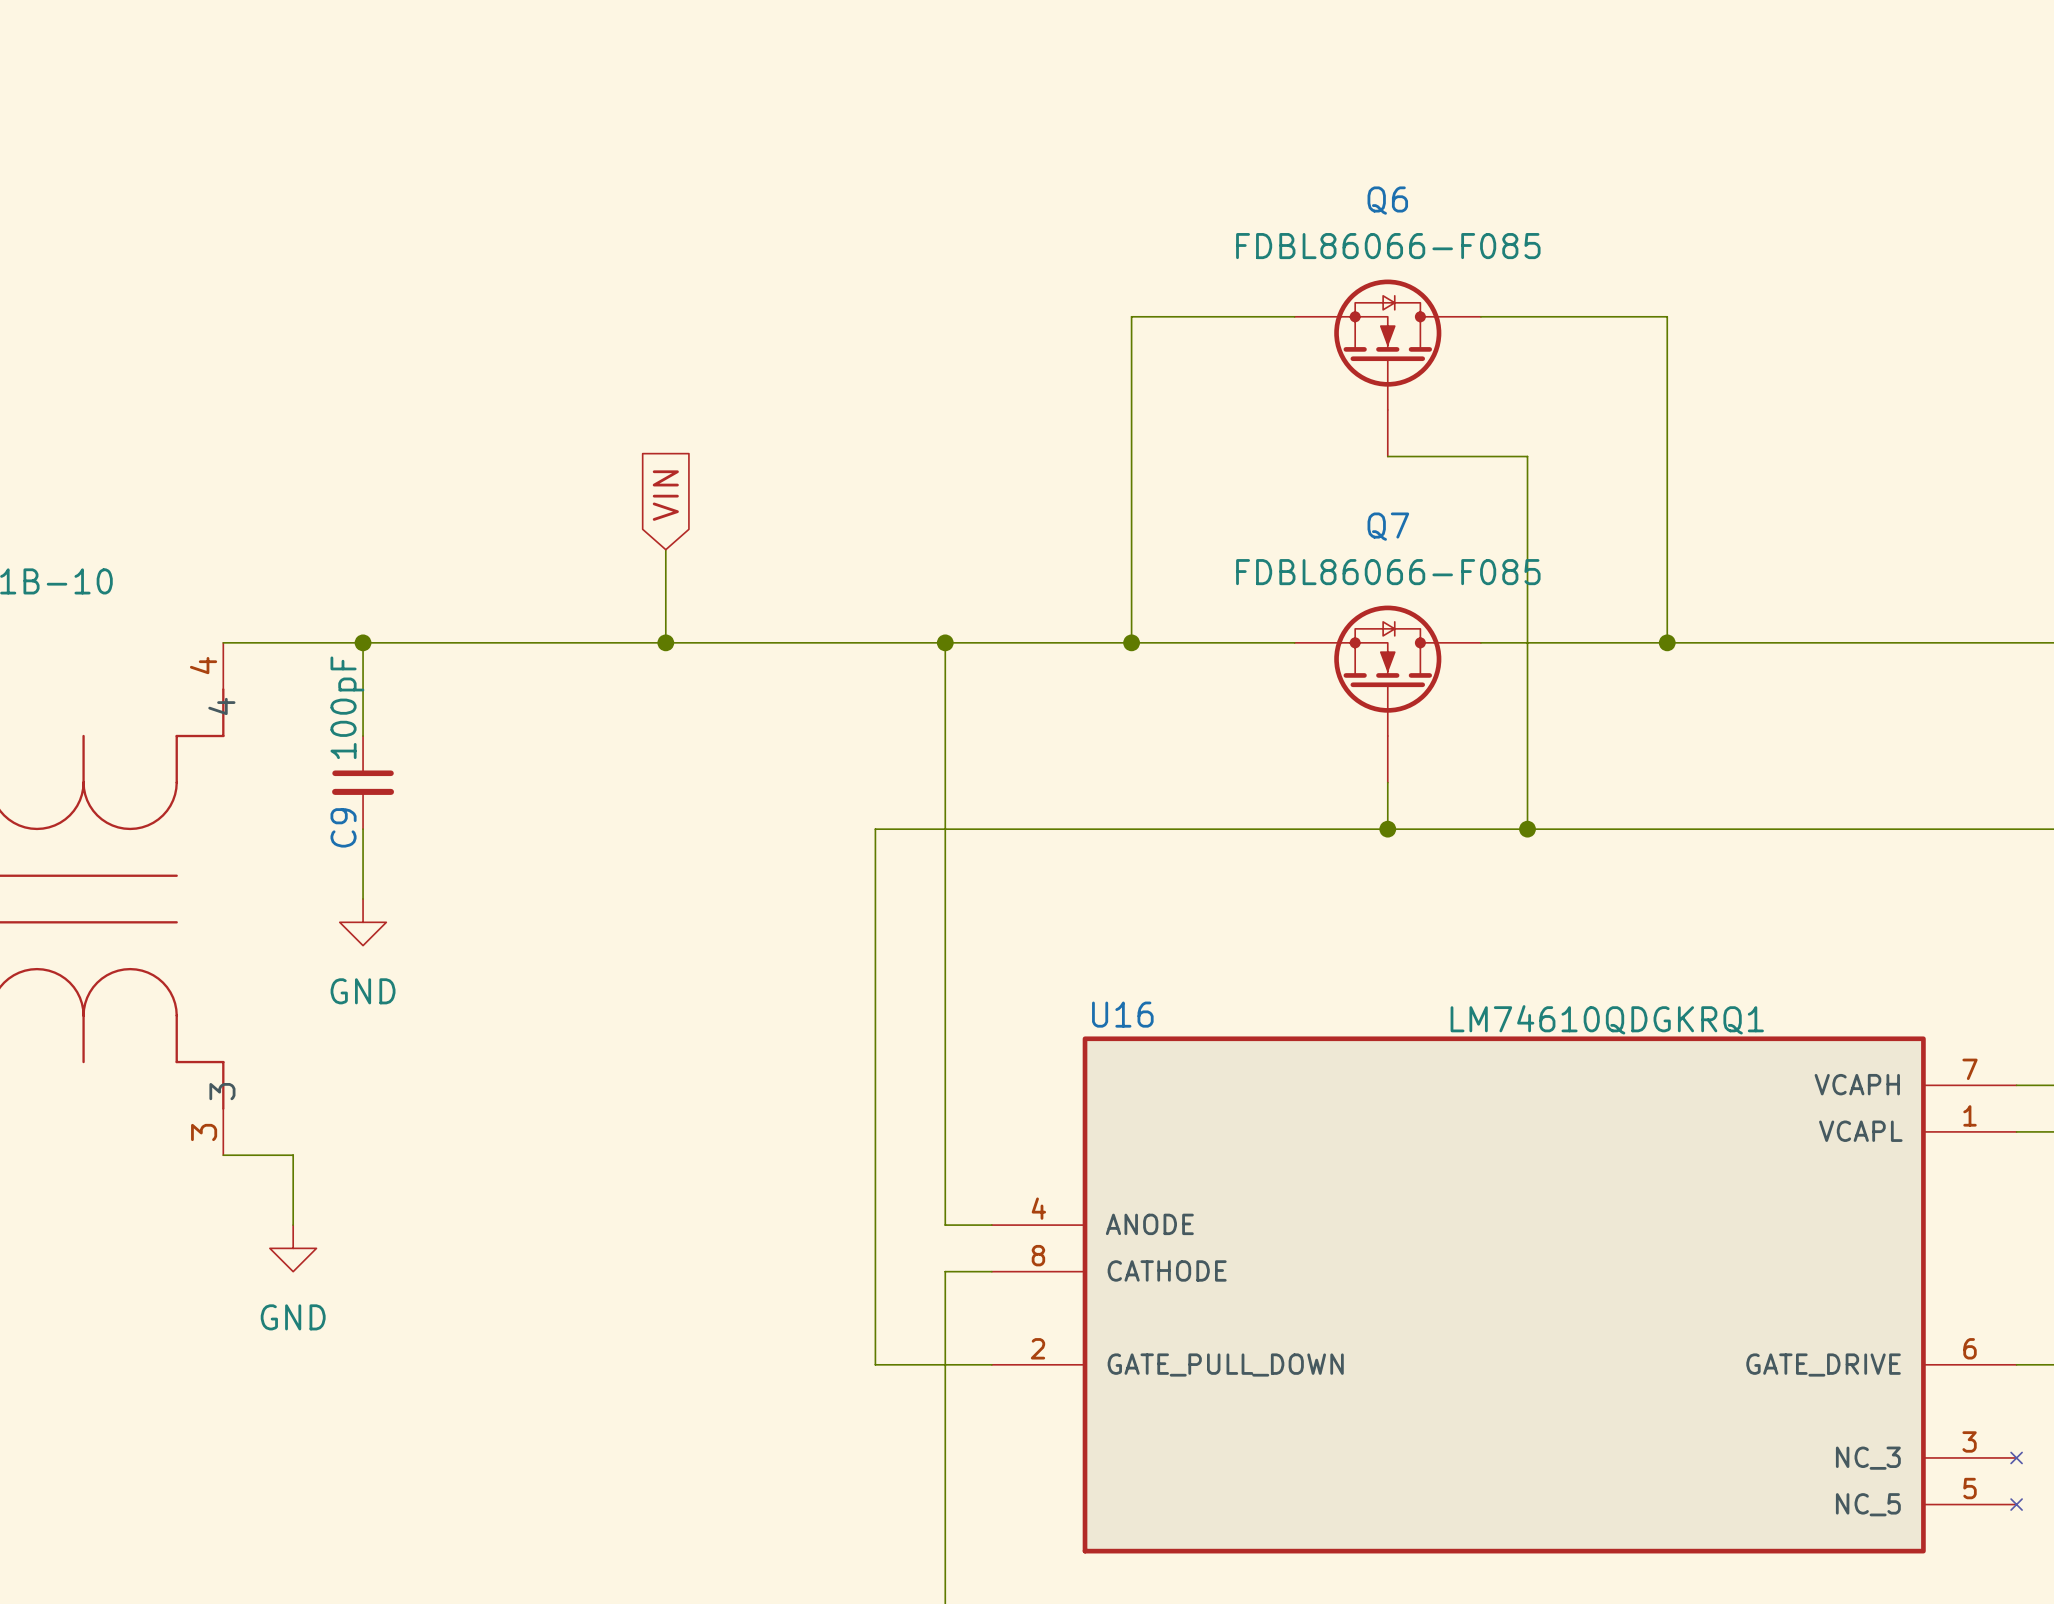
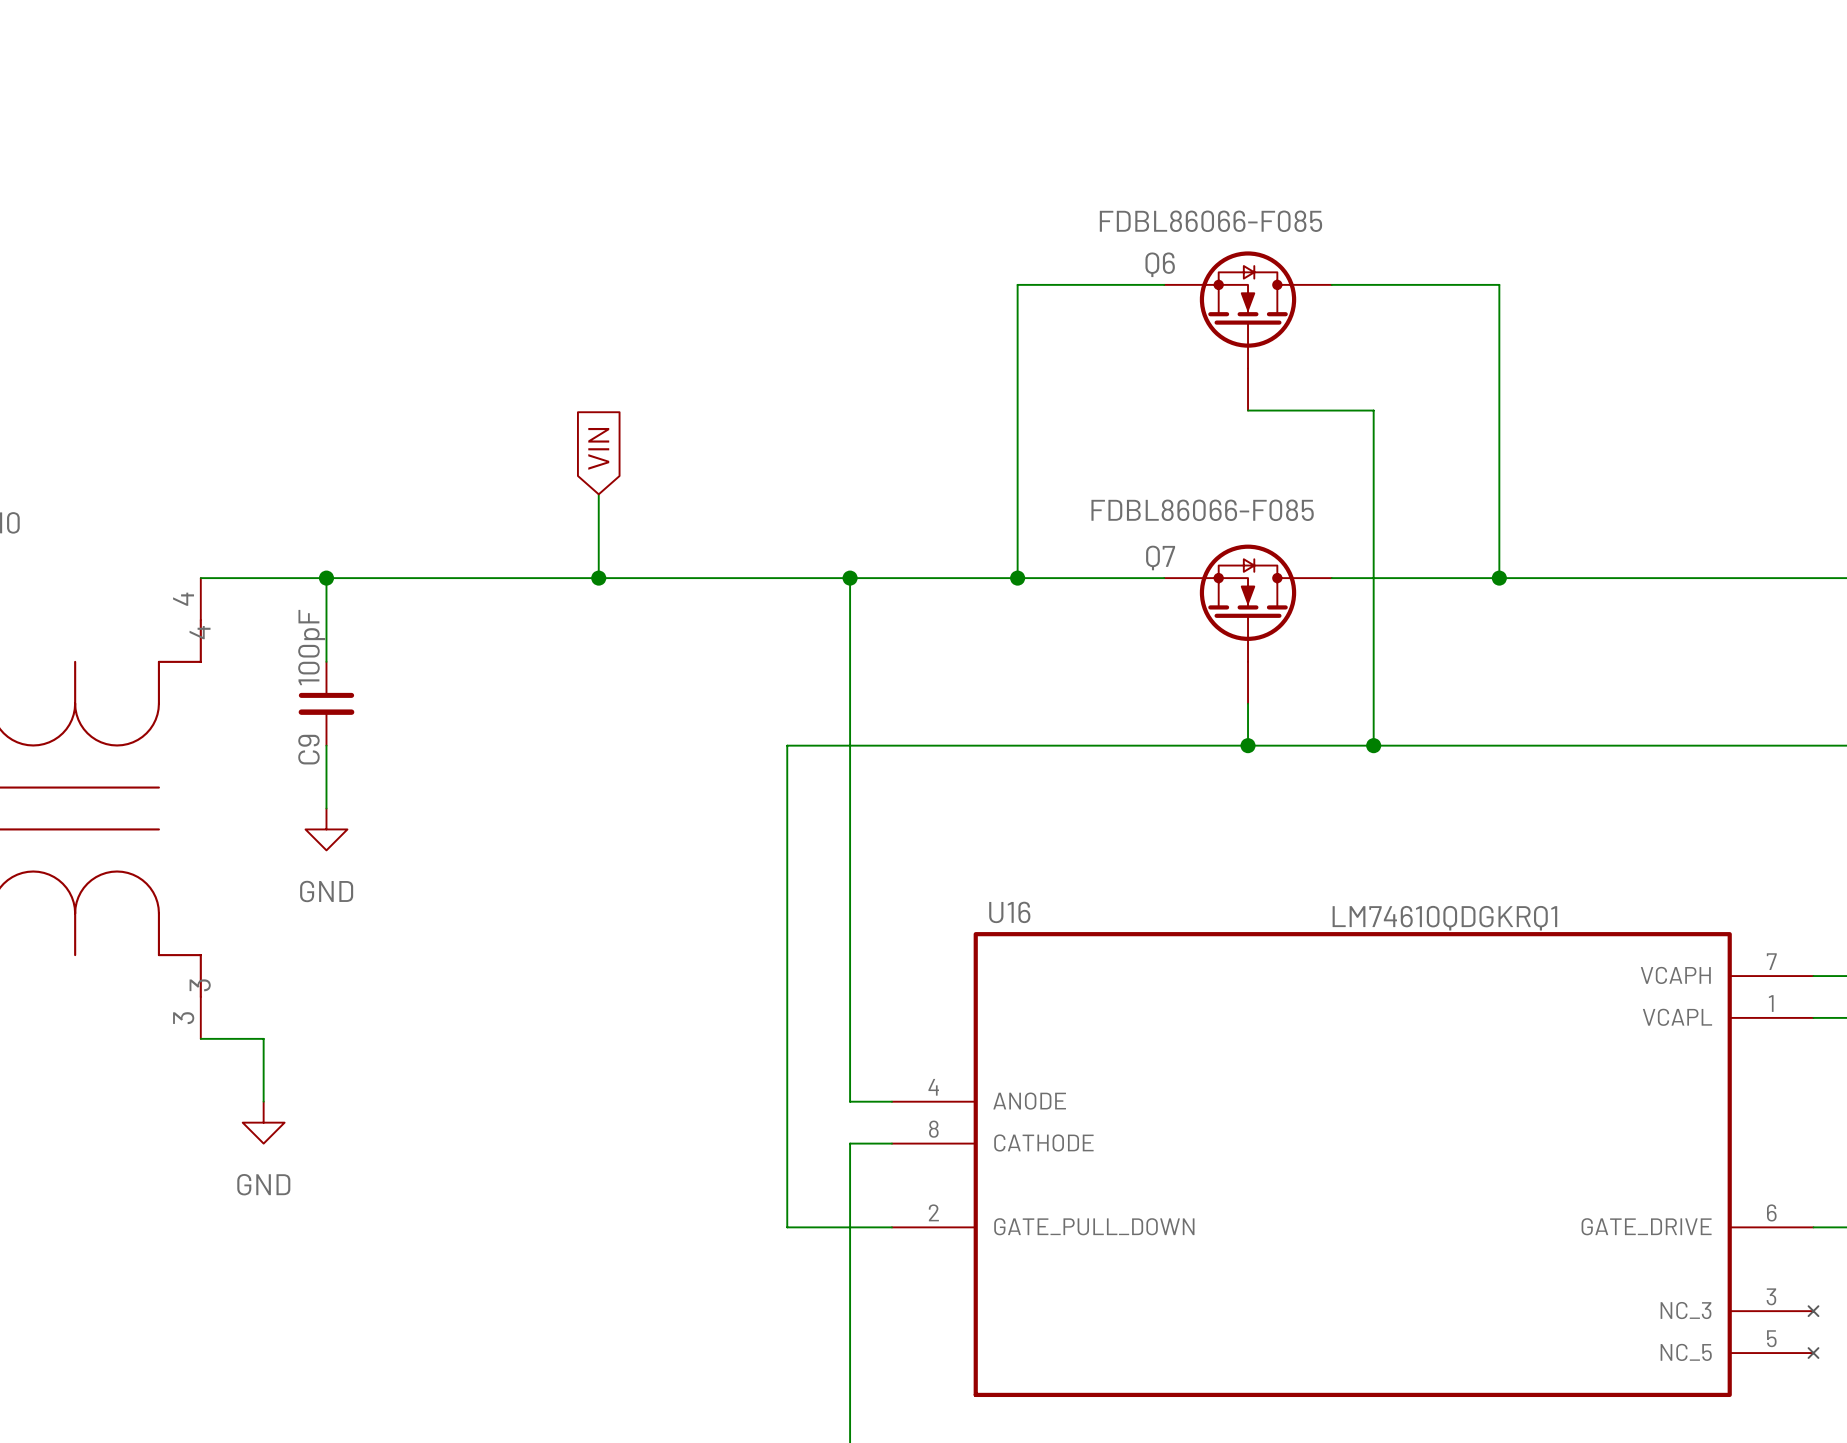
Q6 name position: Q6 (1387, 200) -> Q6 (1160, 264)
Q6 value position: FDBL86066-F085 (1388, 246) -> FDBL86066-F085 (1210, 221)
Q7 name position: Q7 (1388, 526) -> Q7 (1160, 557)
Q7 value position: FDBL86066-F085 (1388, 572) -> FDBL86066-F085 (1202, 510)

